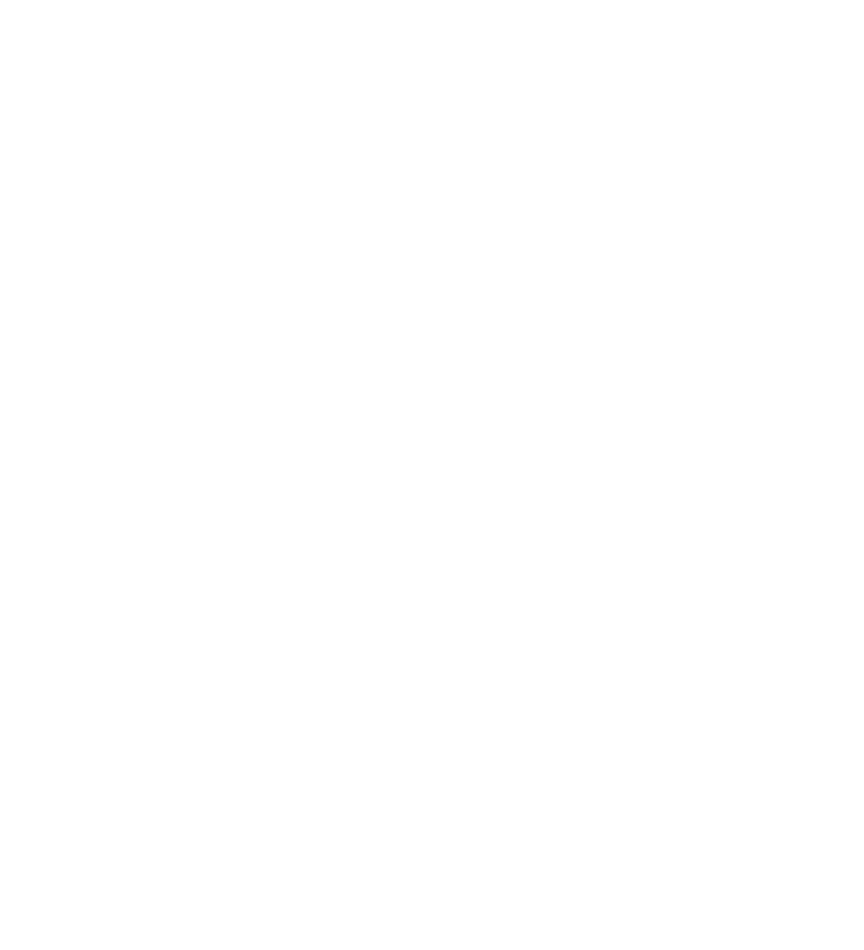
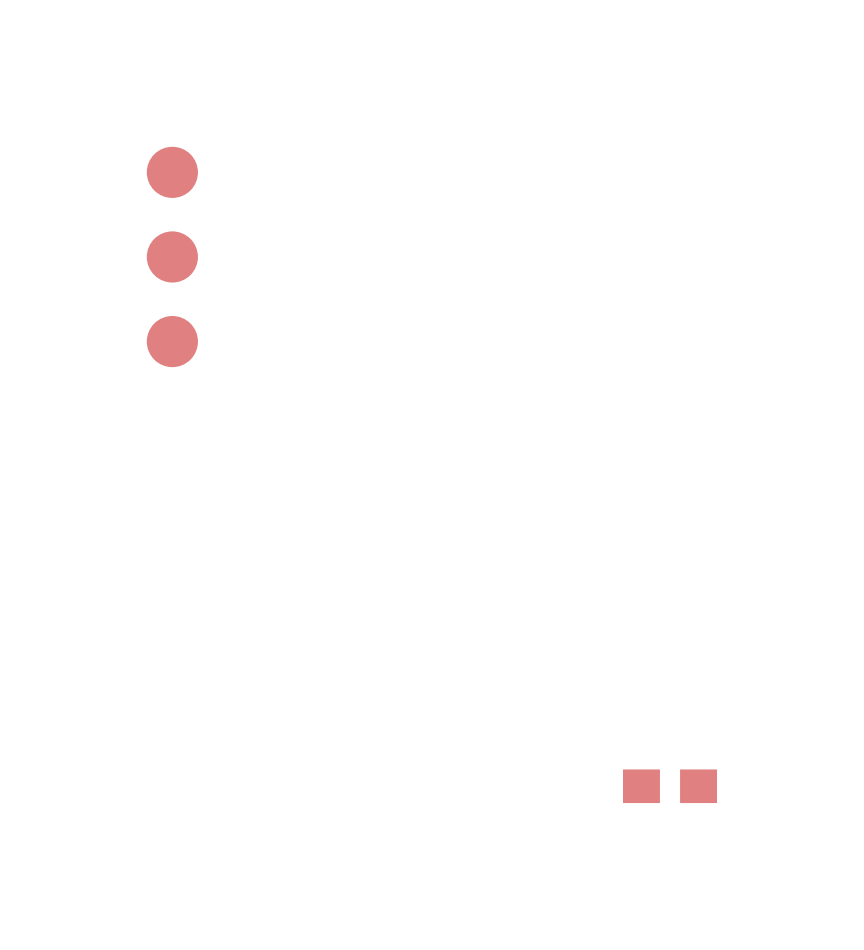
part: none -> (172, 172)
part: none -> (172, 256)
part: none -> (172, 341)
part: none -> (670, 786)

